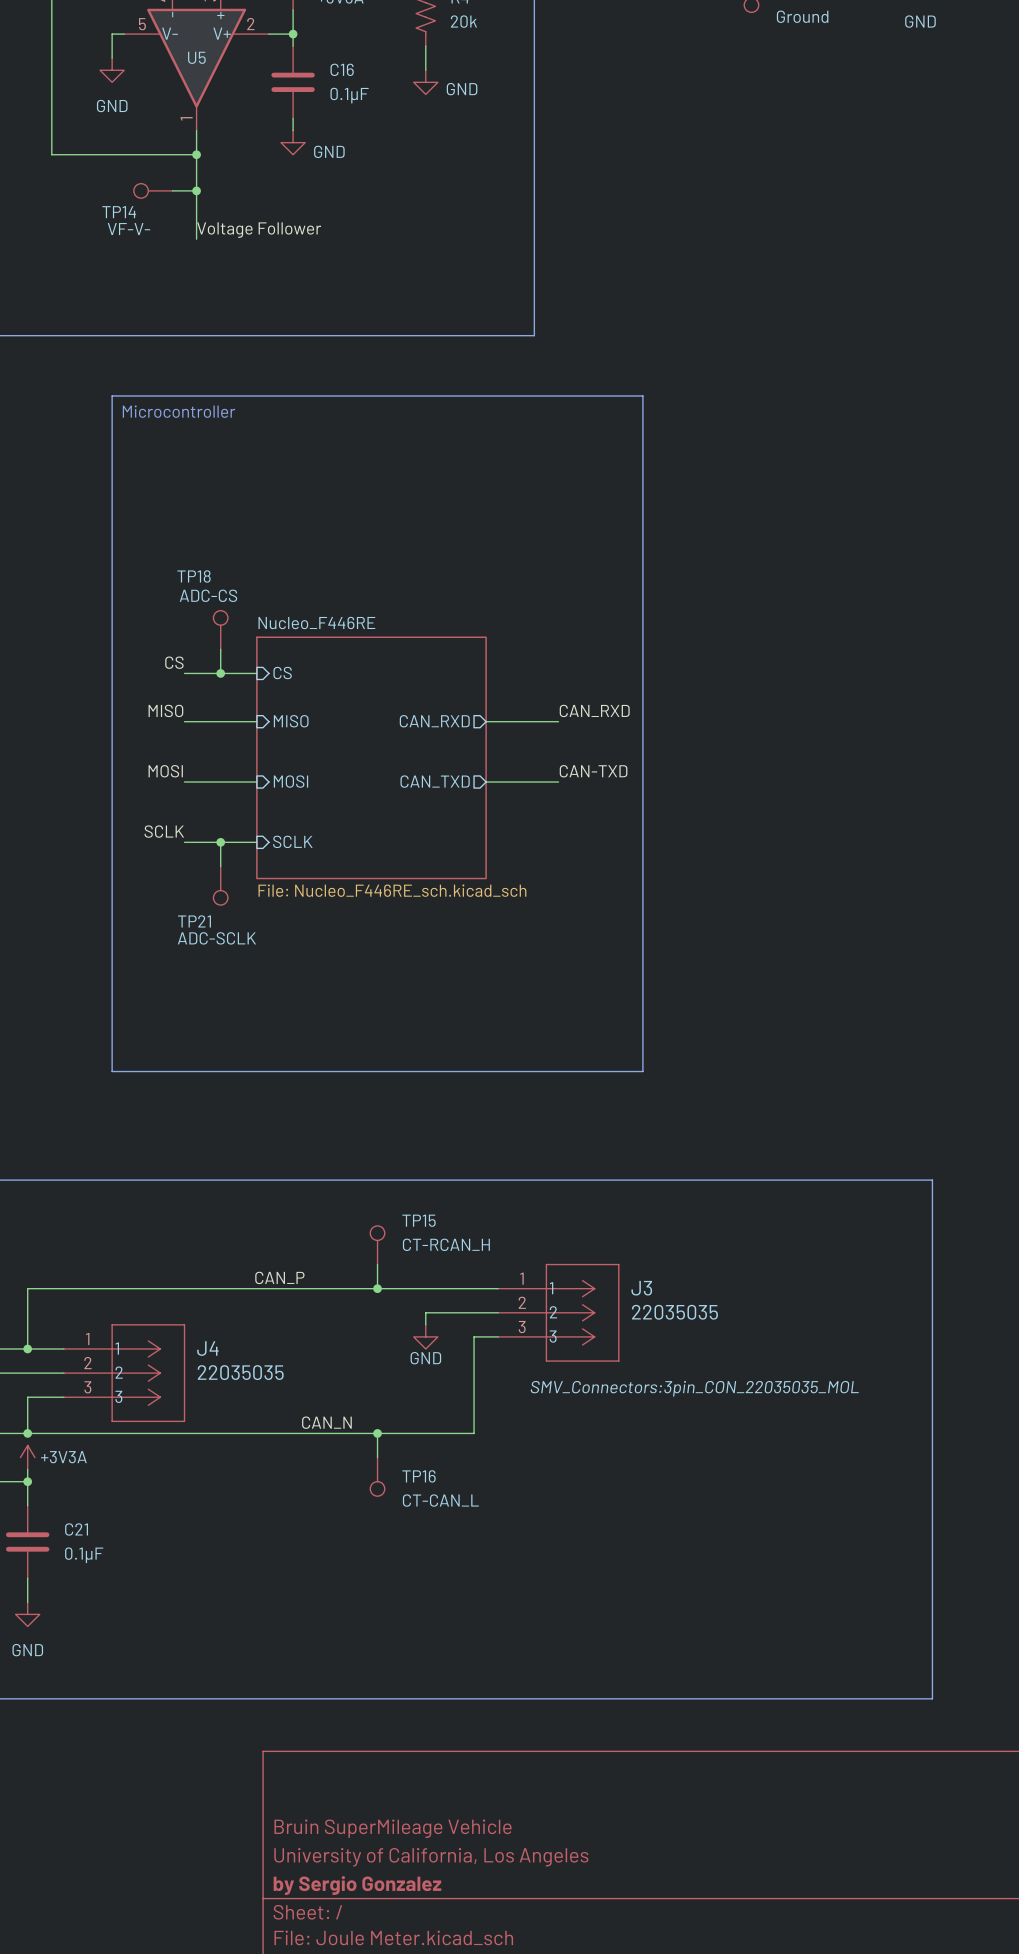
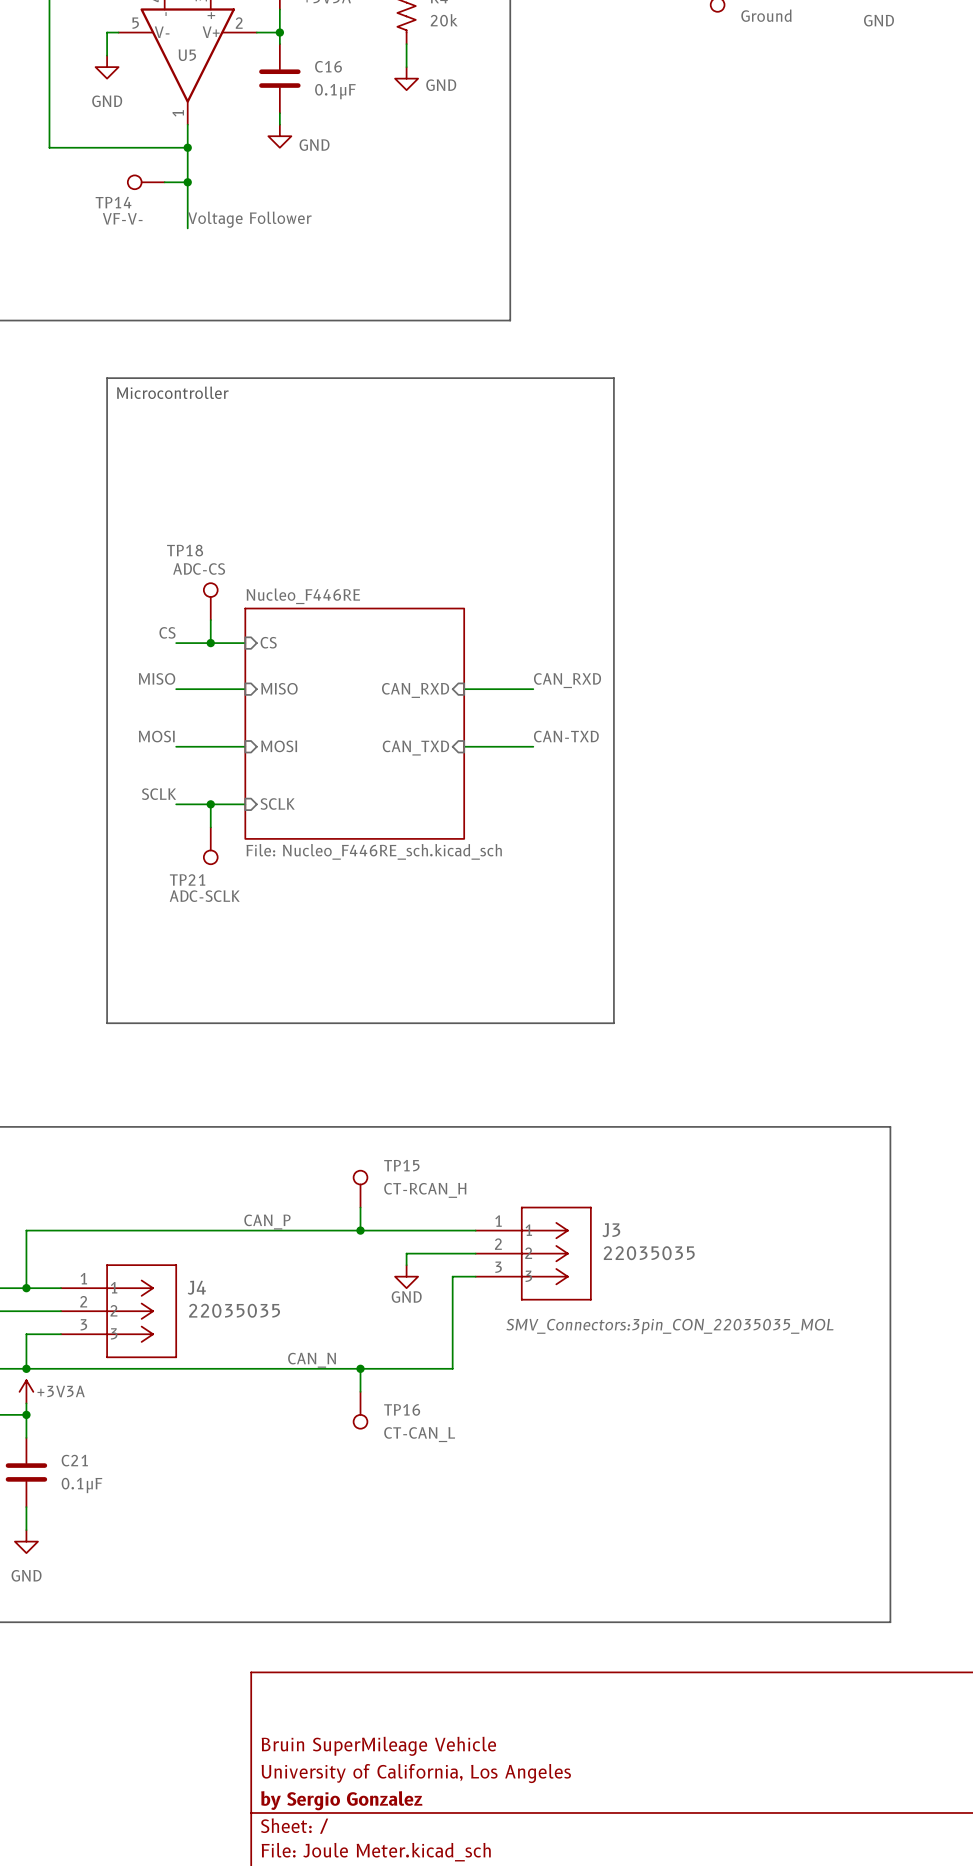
sheet pin shape: output (434, 721) -> input (415, 690)
sheet pin shape: output (435, 781) -> input (415, 748)

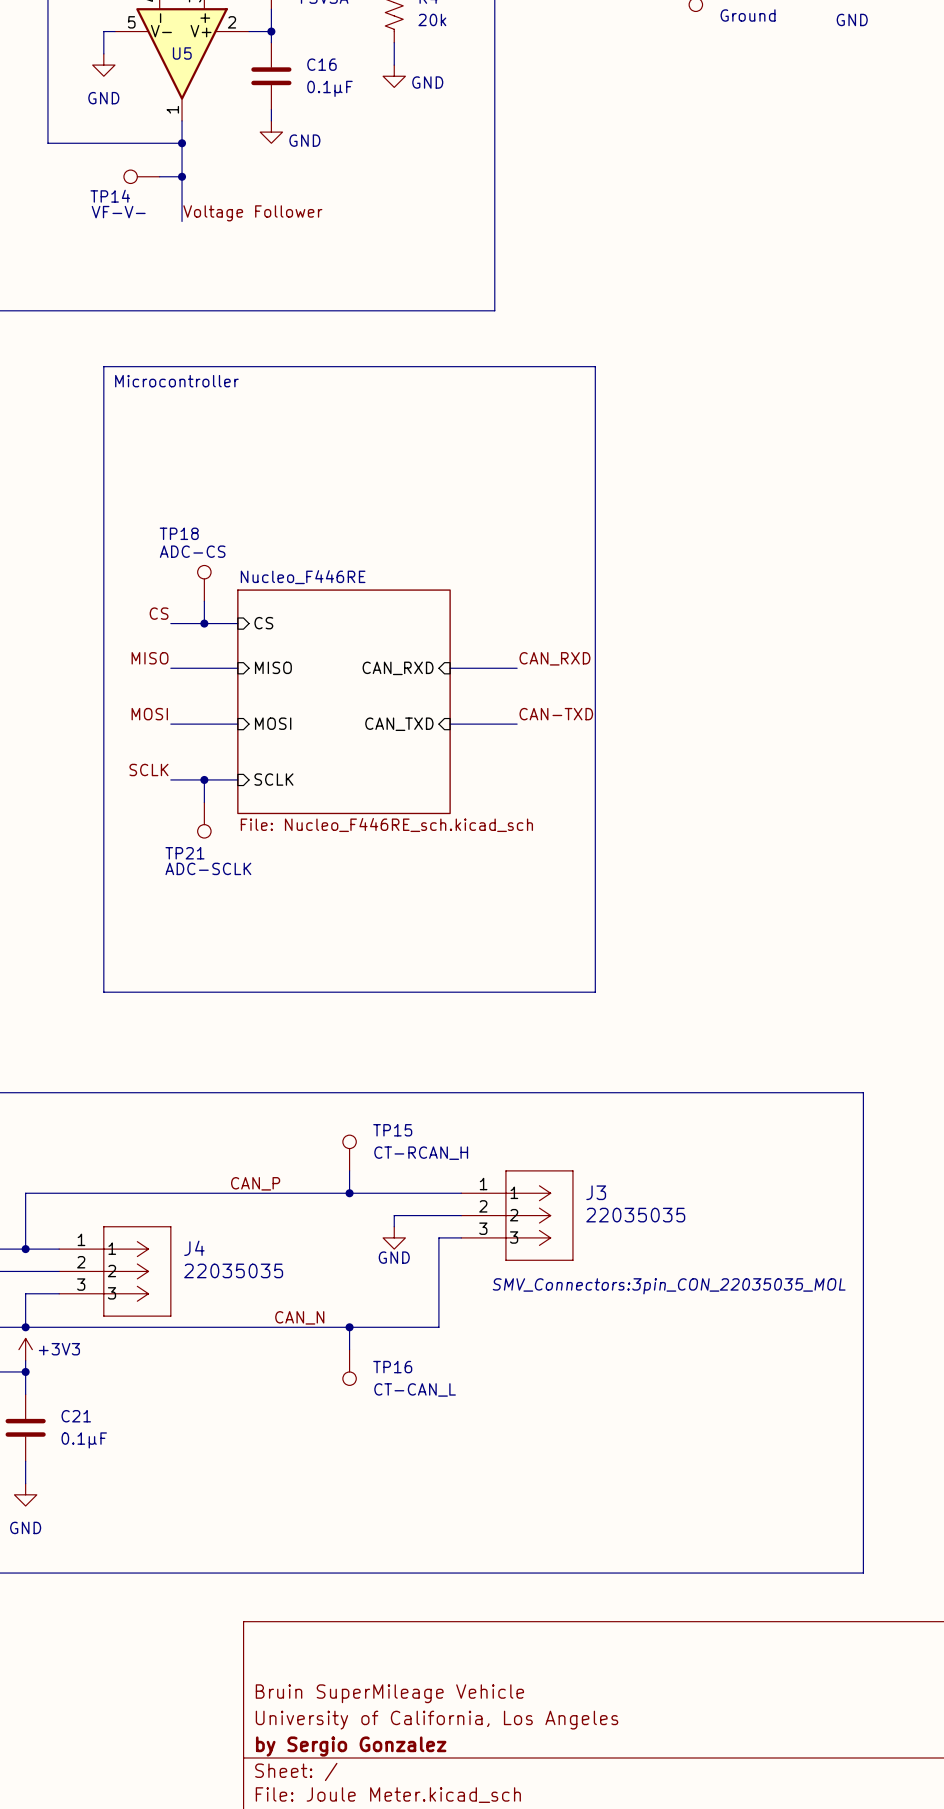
power symbol: +3V3A (26, 1391) -> +3V3 (25, 1349)

